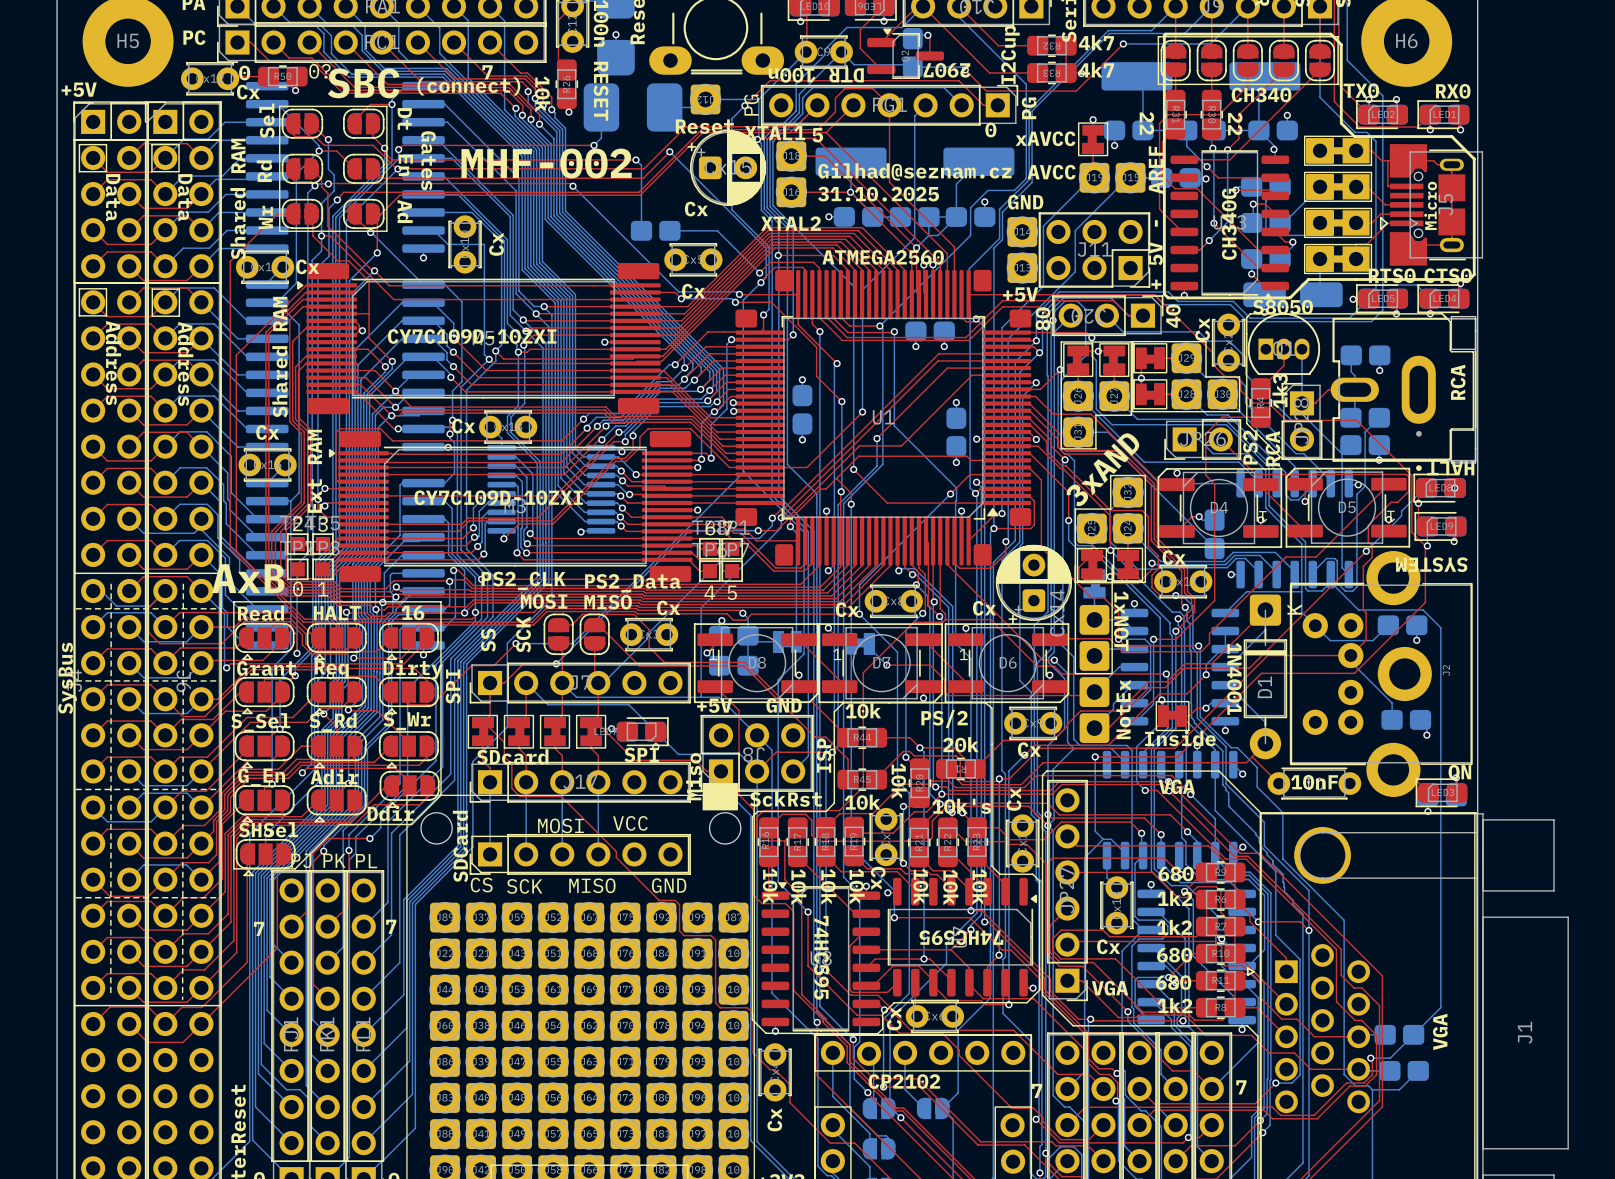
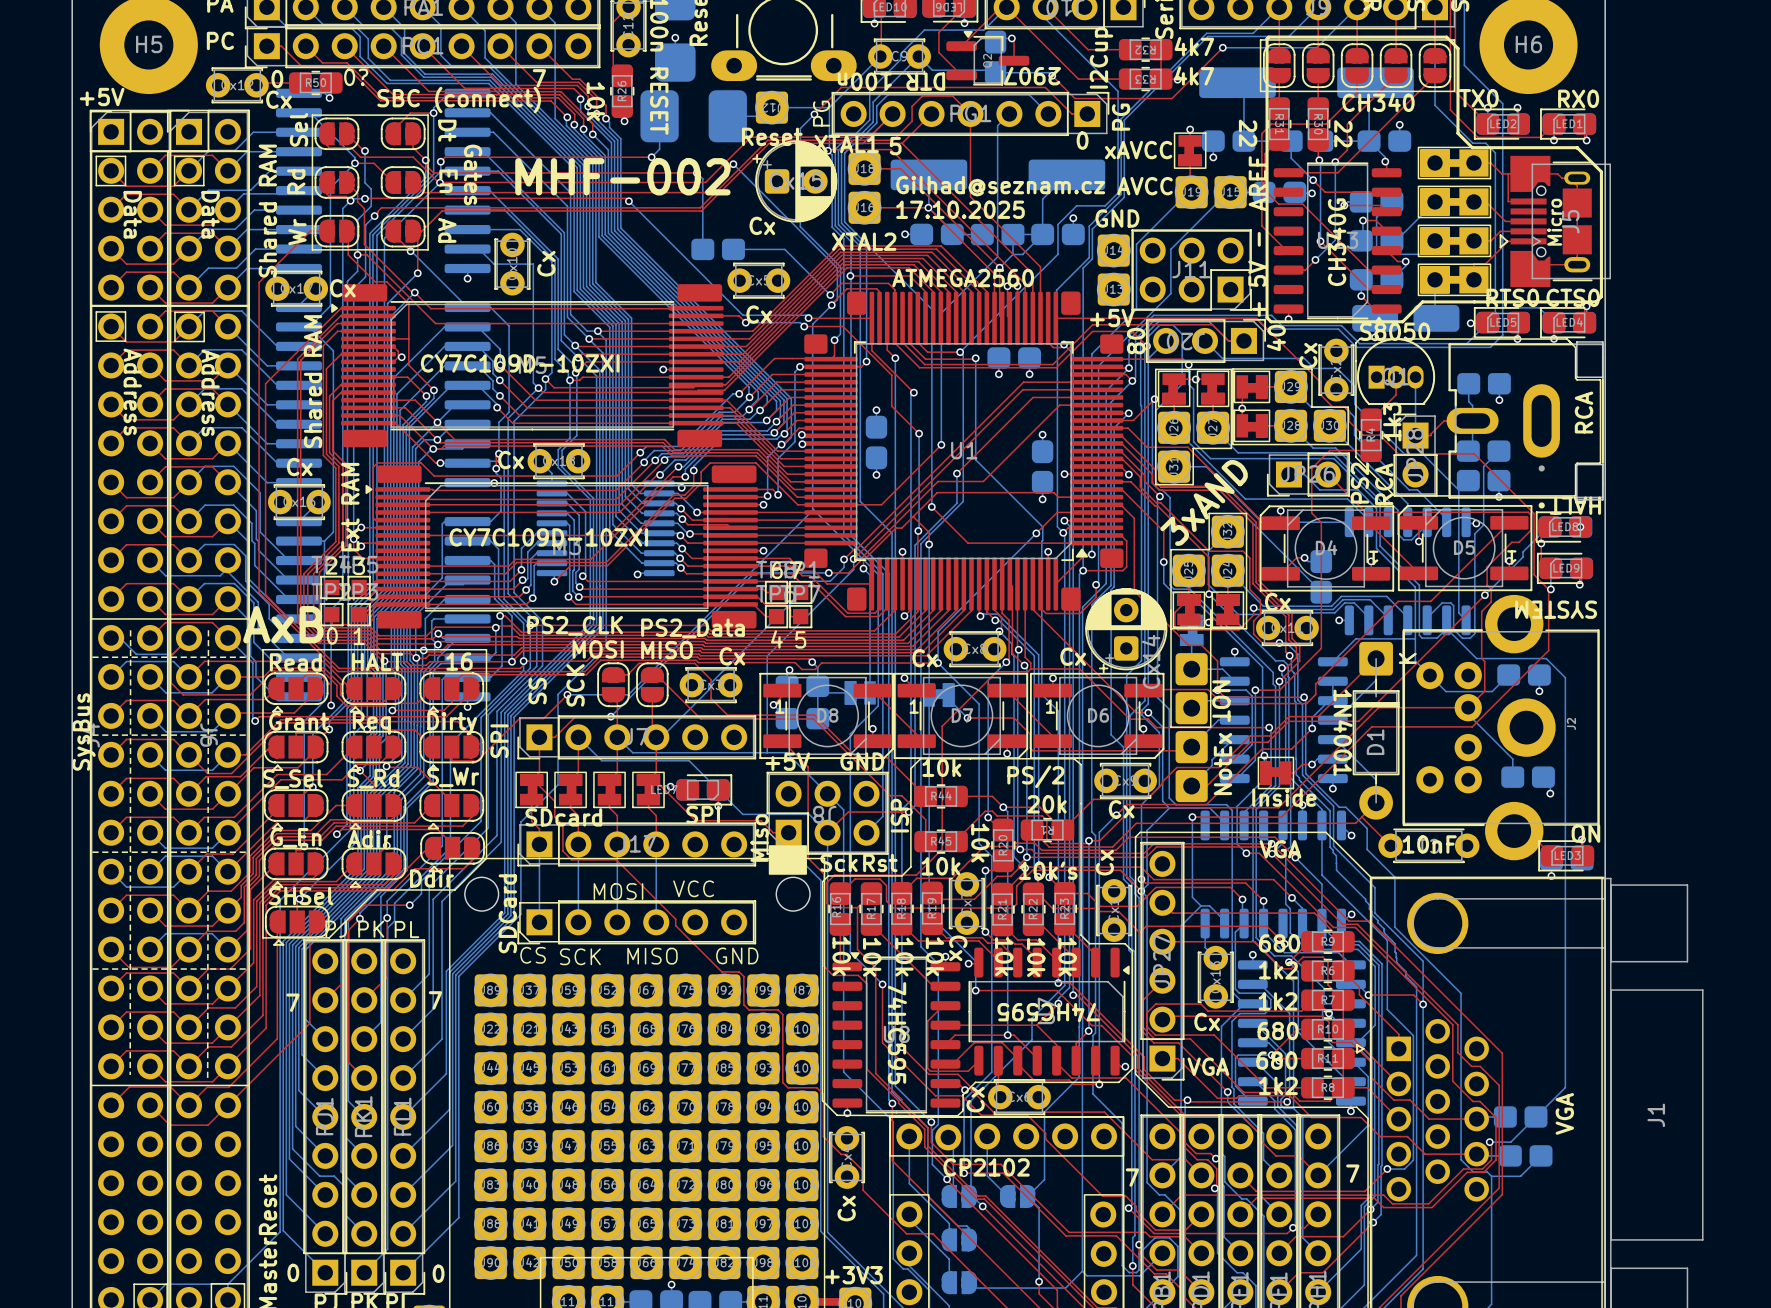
text: SBC (363, 83) -> SBC (connect) (459, 100)
text: (connect) (468, 86) -> none
text: 31.10.2025 (878, 194) -> 17.10.2025 (960, 209)
text: 1xNOT (1121, 621) -> NOT (1221, 701)

